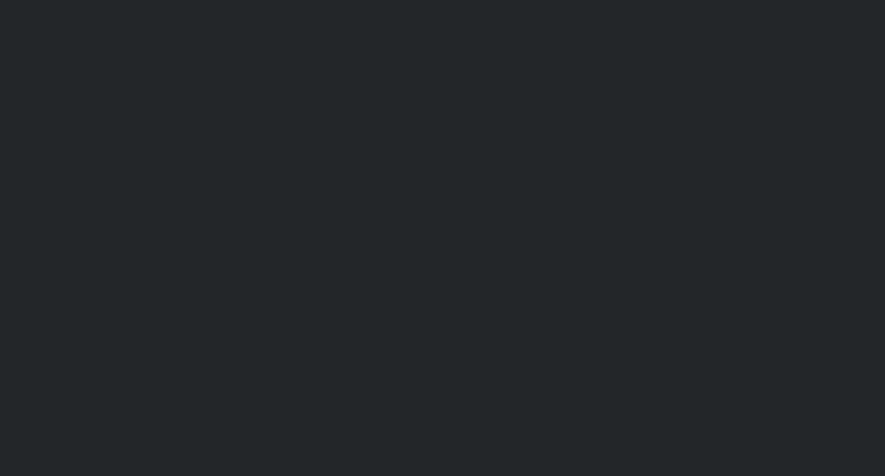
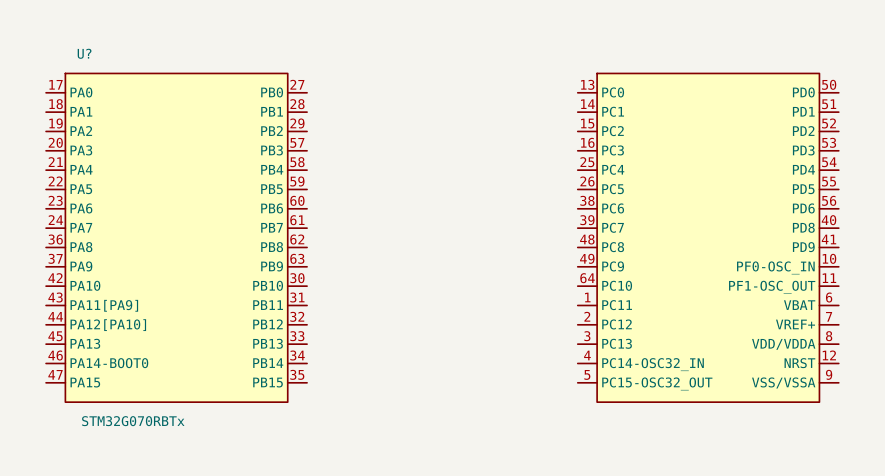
U?: none -> STM32G070RBTx (442, 237)

